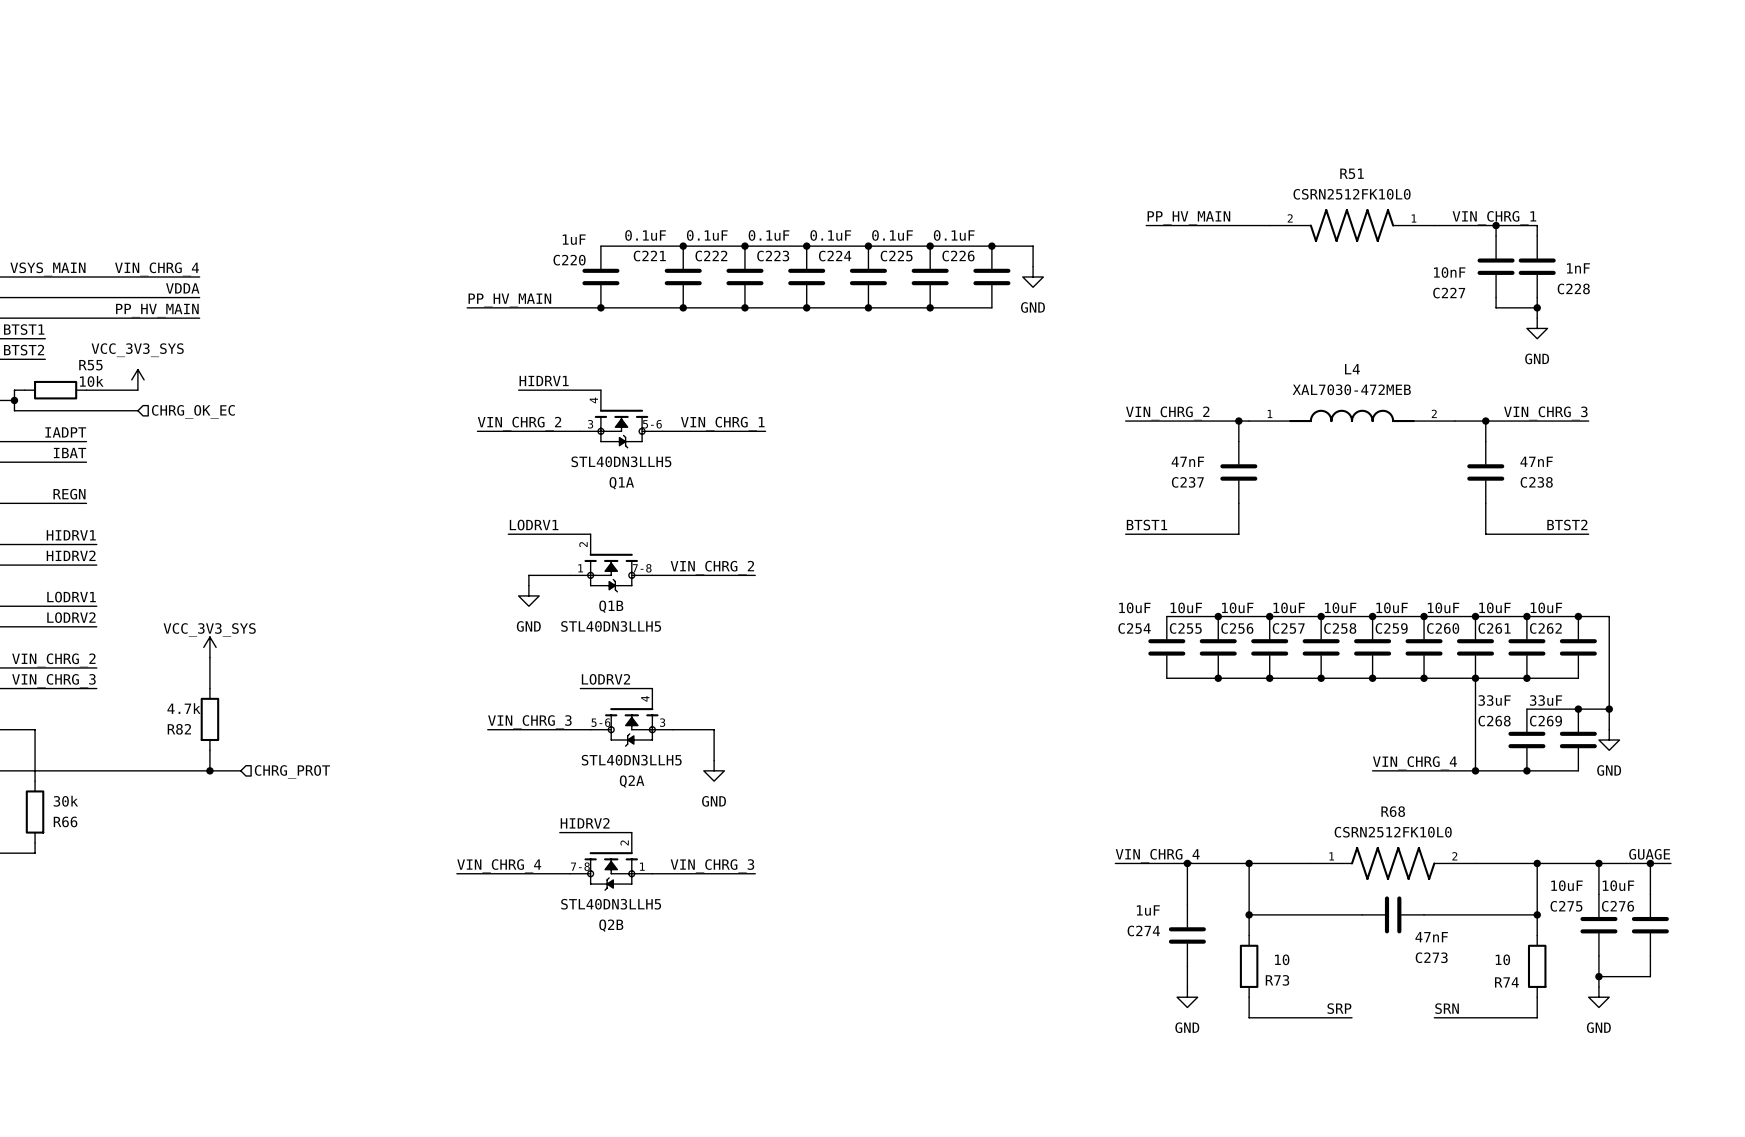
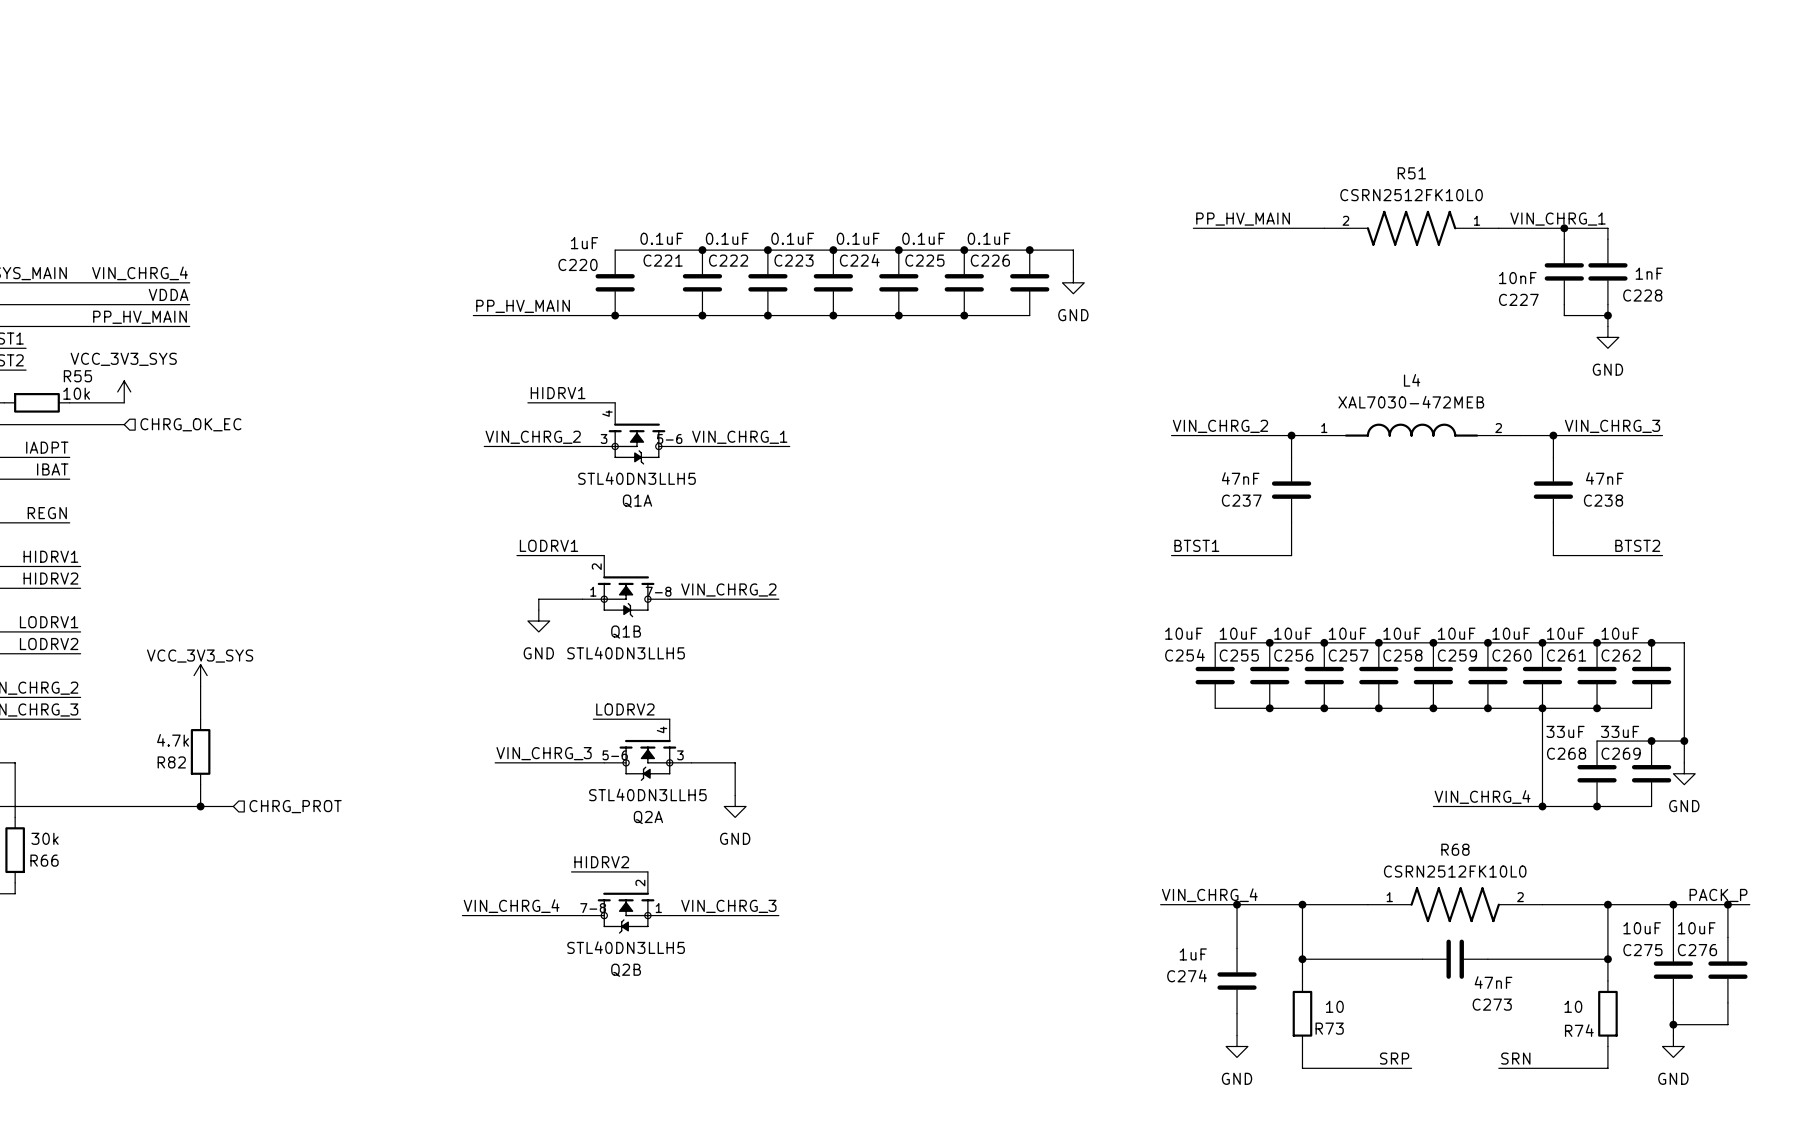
label: GUAGE (1649, 854) -> PACK_P (1718, 895)

